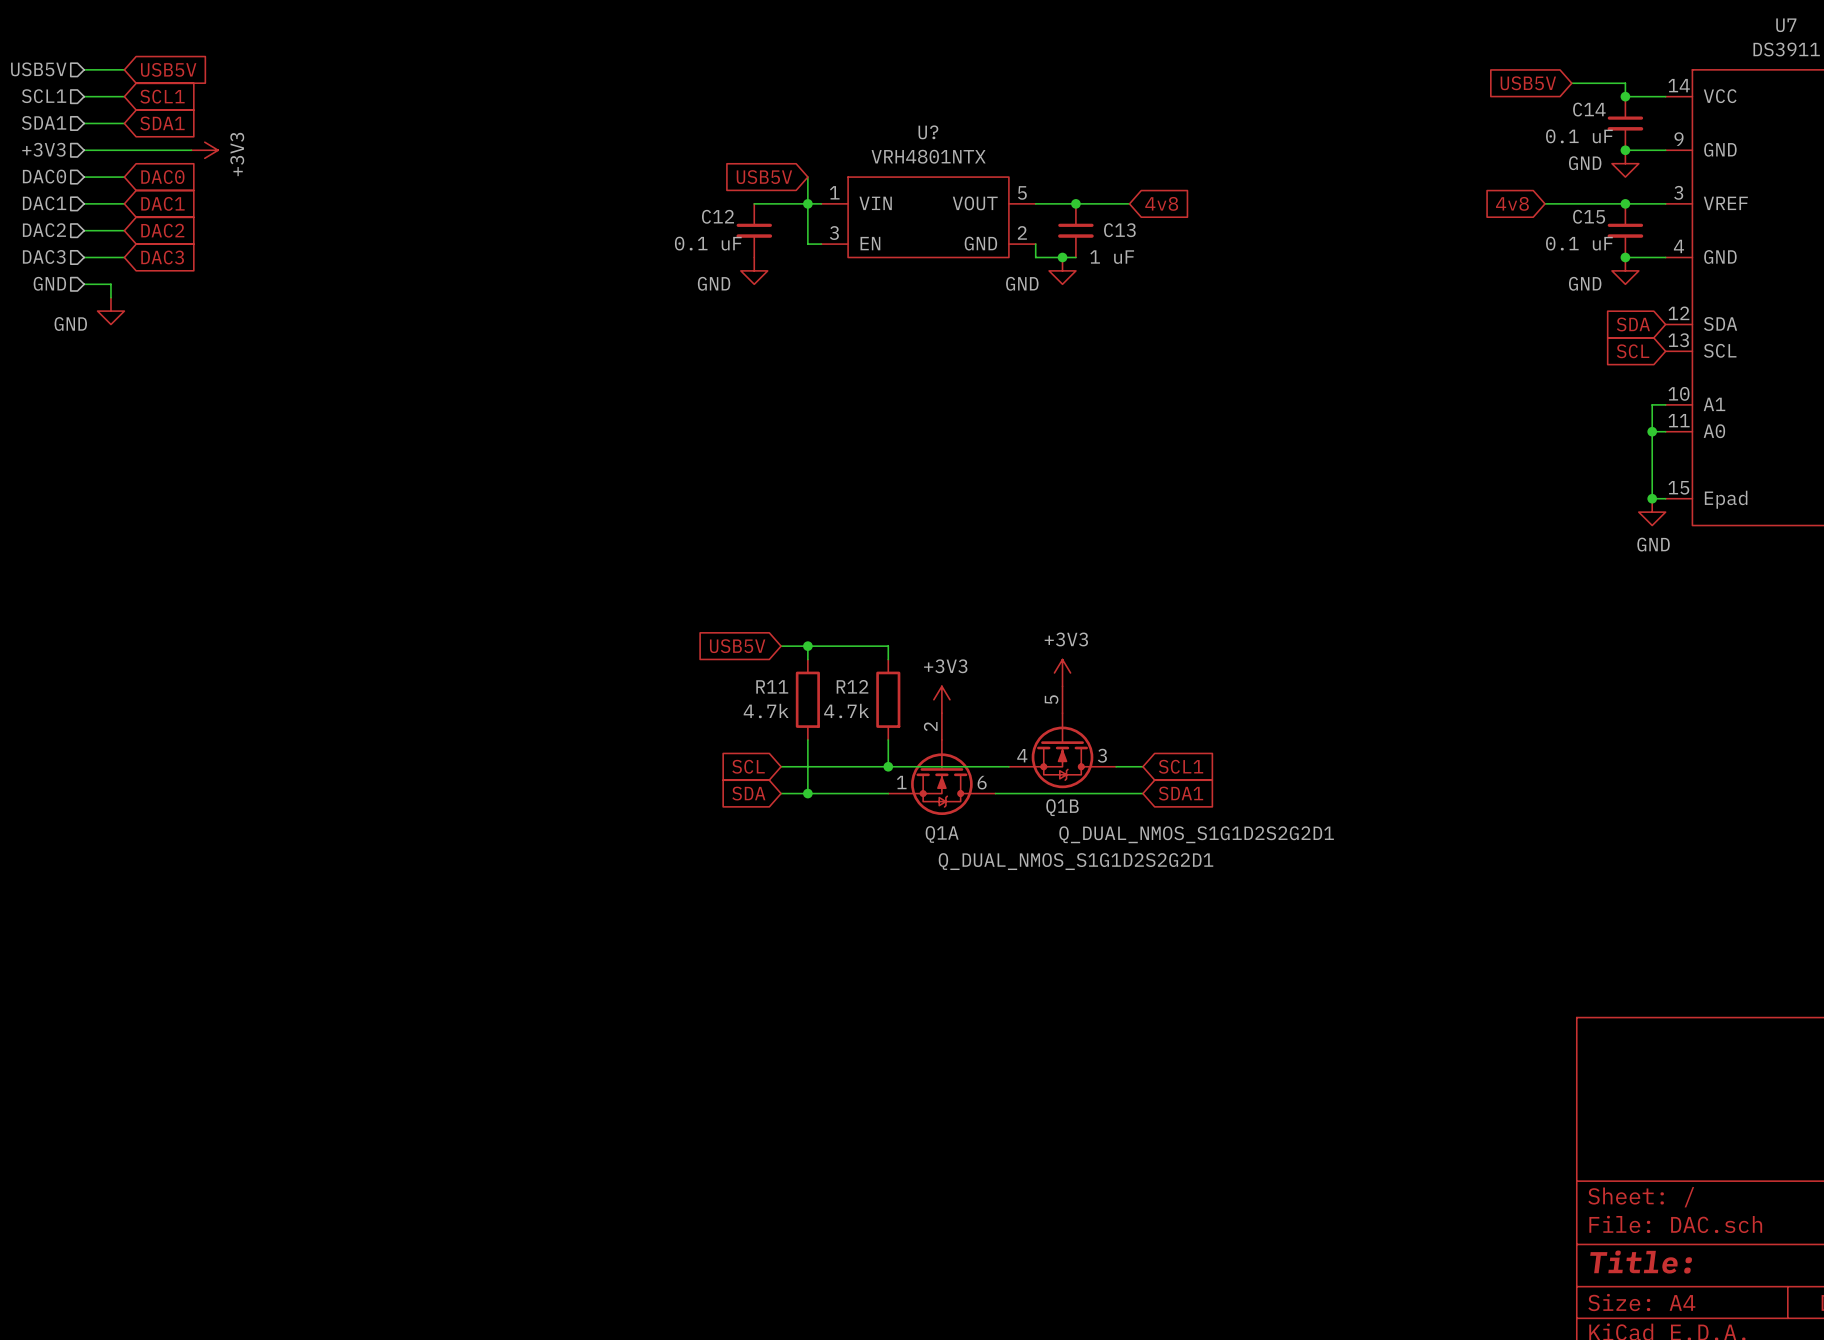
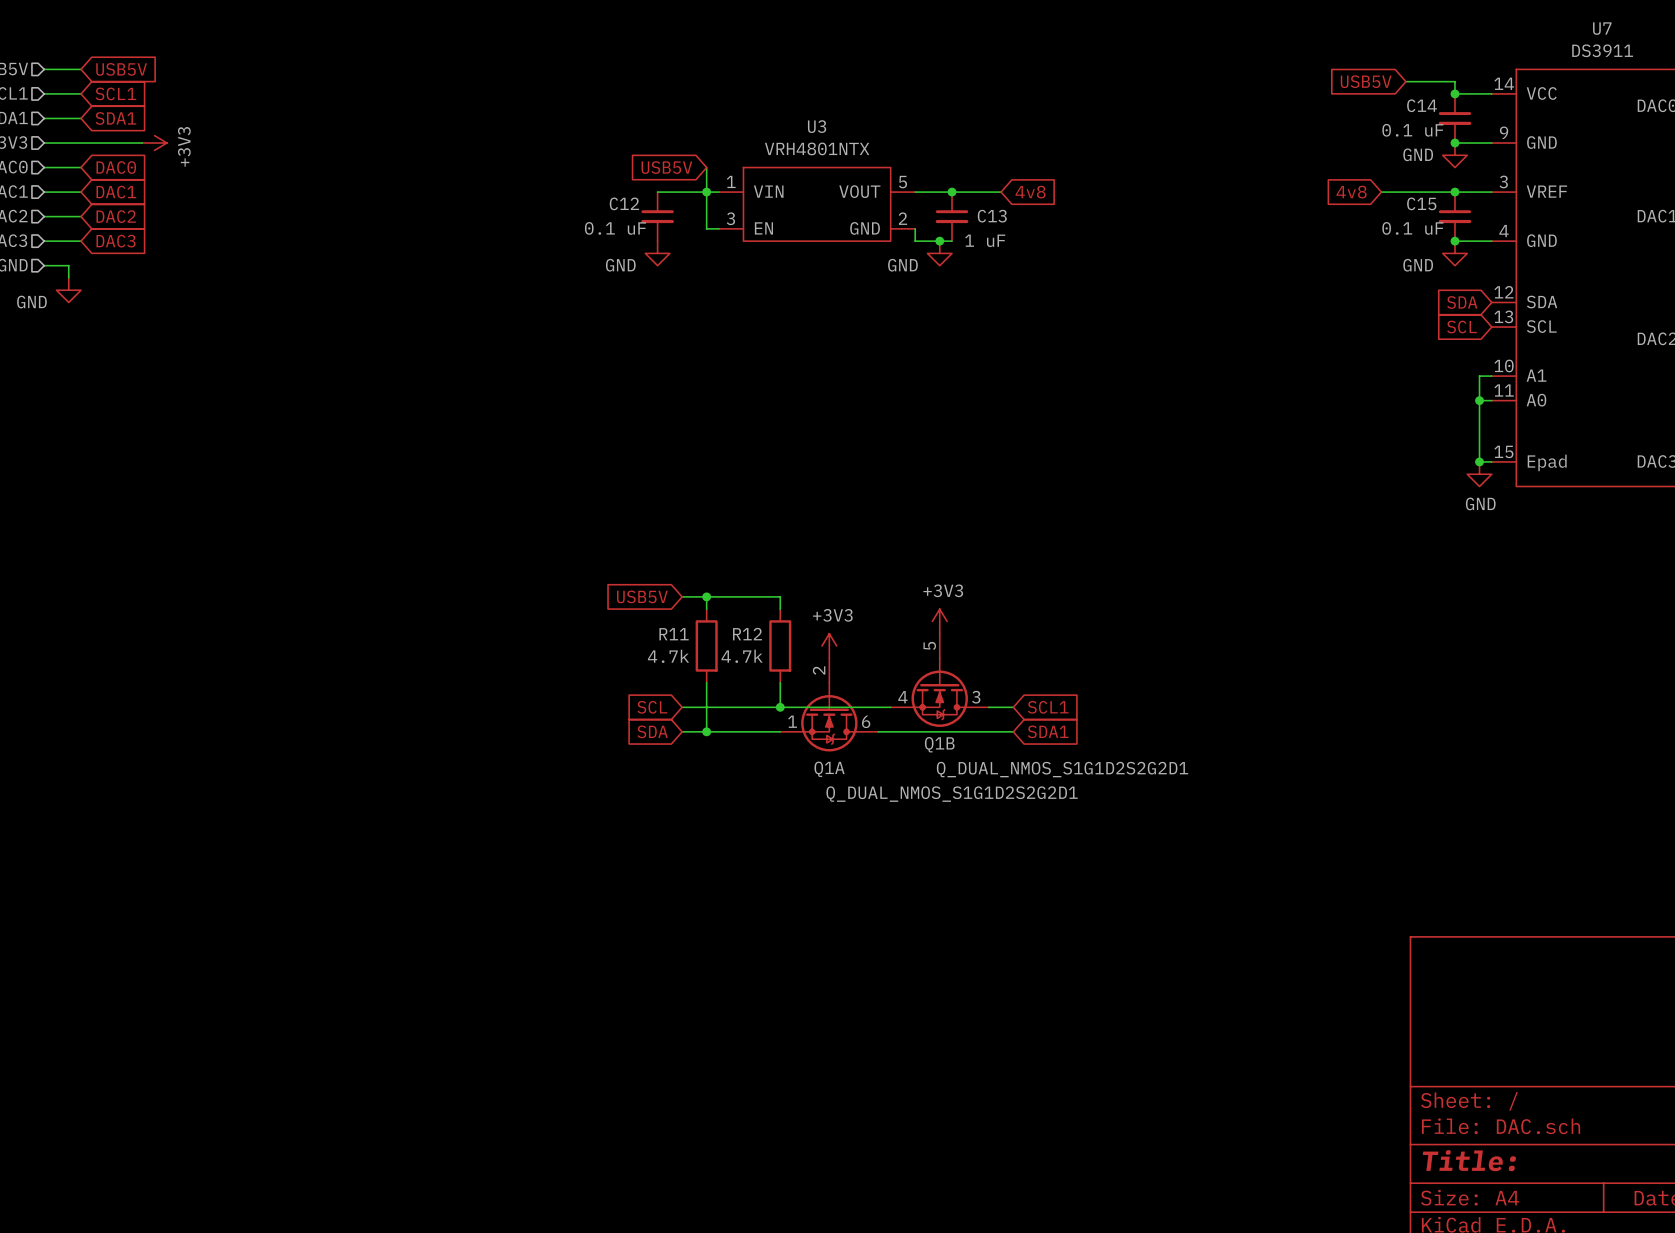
U? name: U? (928, 132) -> U3 (817, 126)

